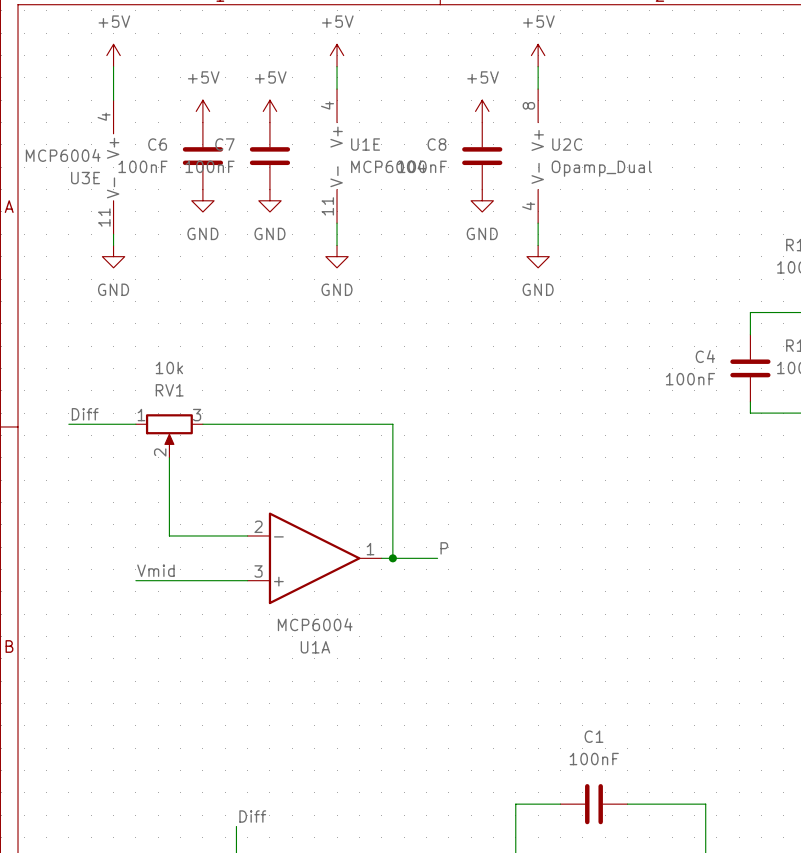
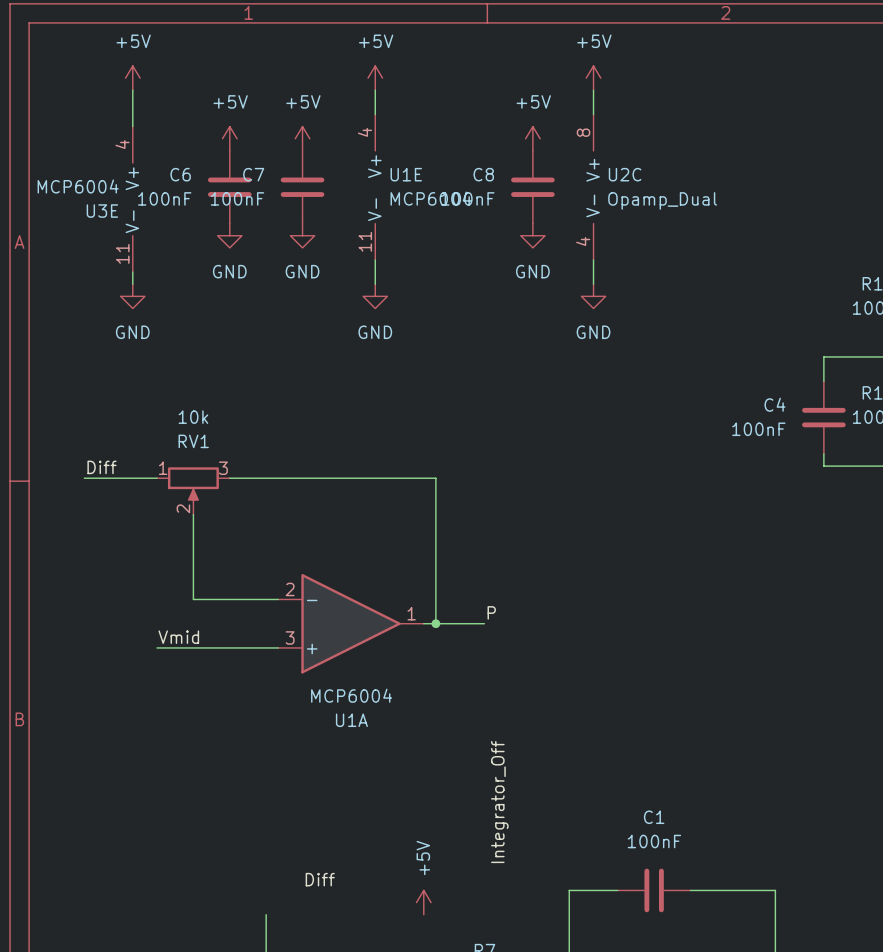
label: none -> Integrator_Off (499, 802)
power symbol: none -> +5V (423, 902)
label position: Diff (252, 816) -> Diff (320, 879)

